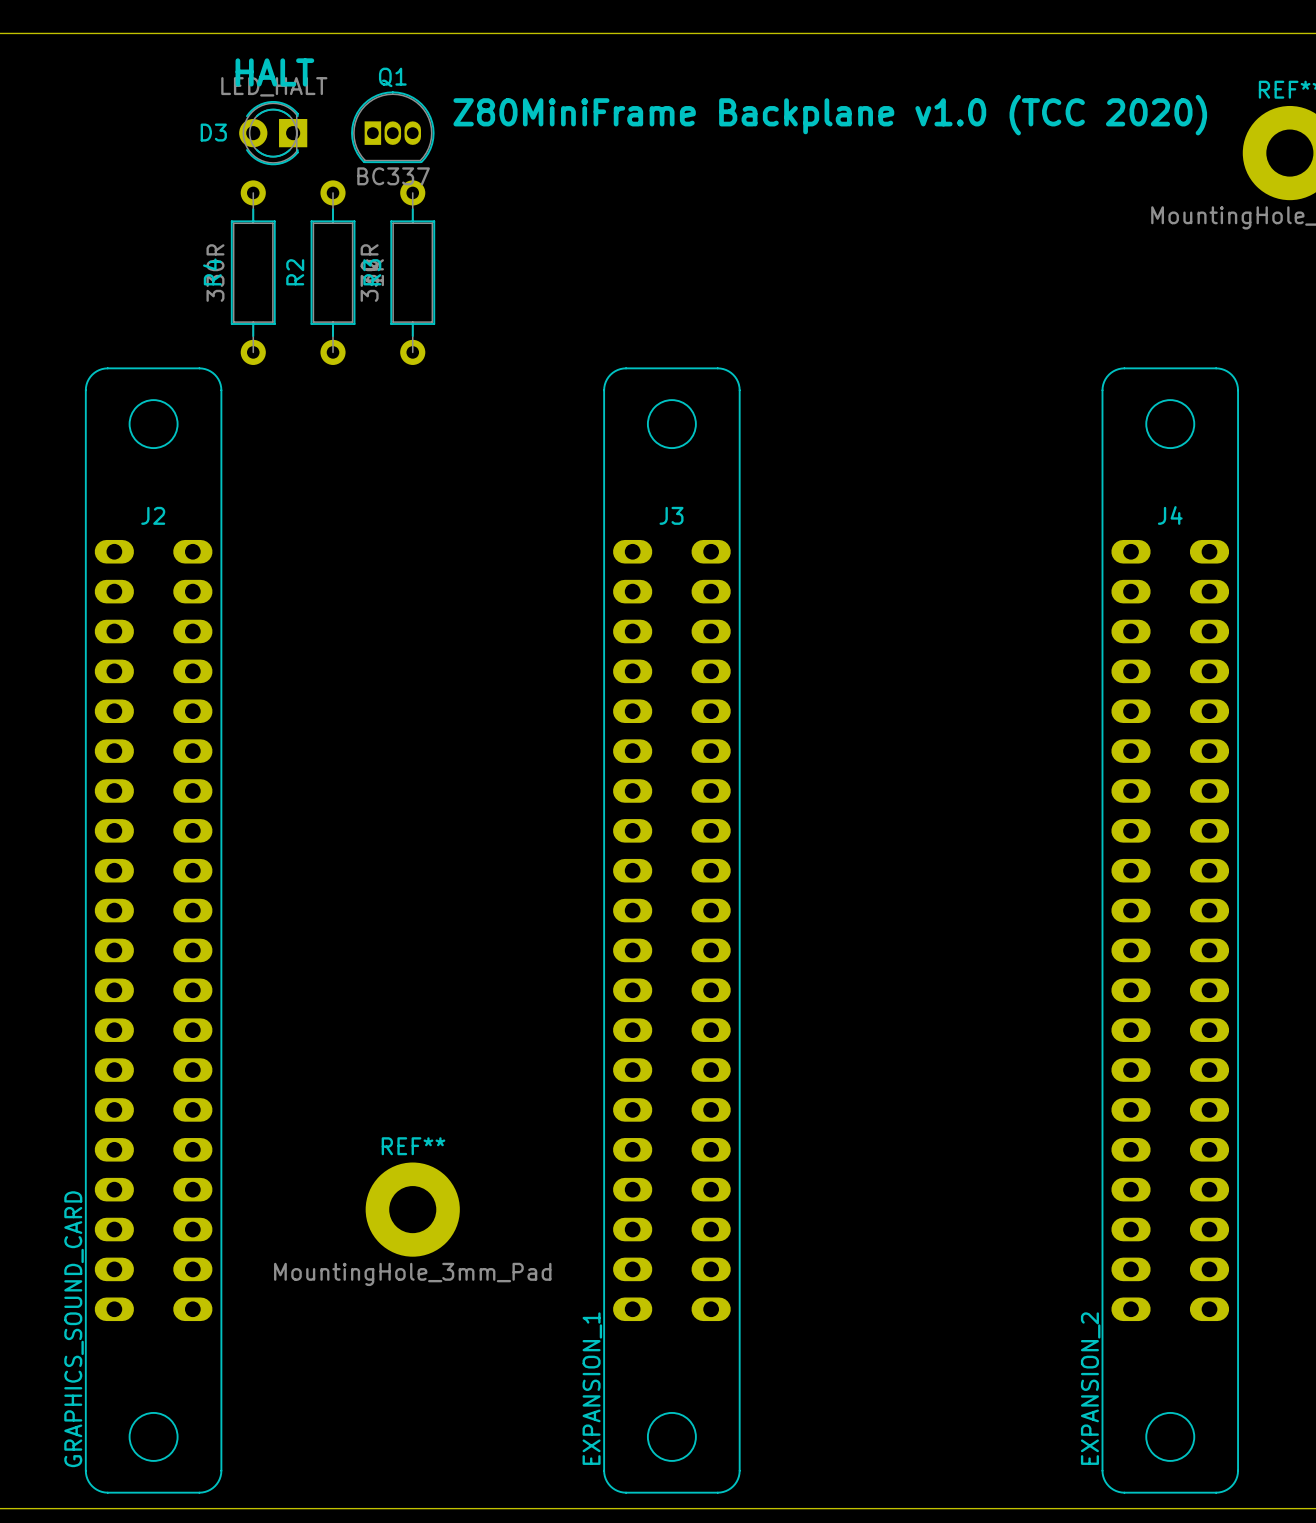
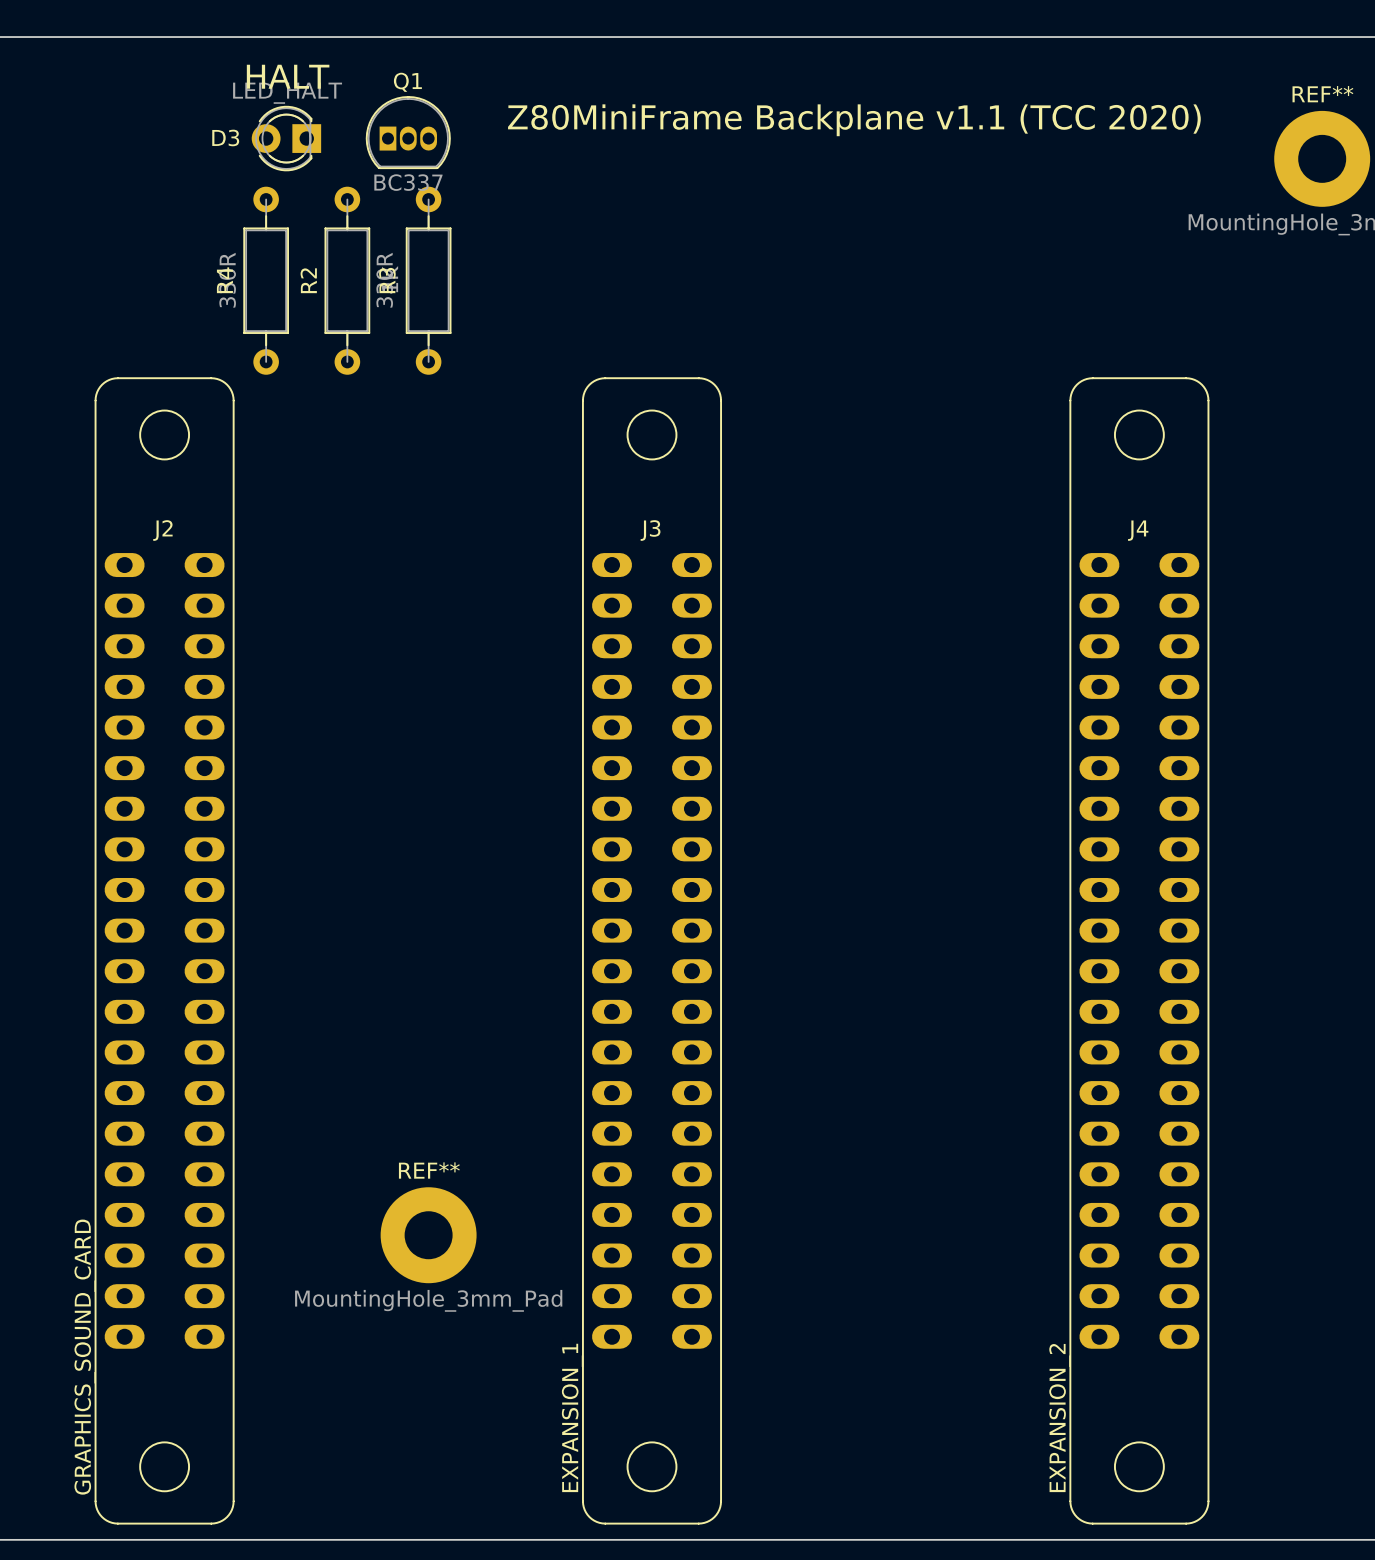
text: Z80MiniFrame Backplane v1.0 (TCC 2020) (830, 115) -> Z80MiniFrame Backplane v1.1 (TCC 2020) (854, 120)
J3 position: (671, 930) -> (652, 950)
J4 position: (1170, 930) -> (1139, 950)

